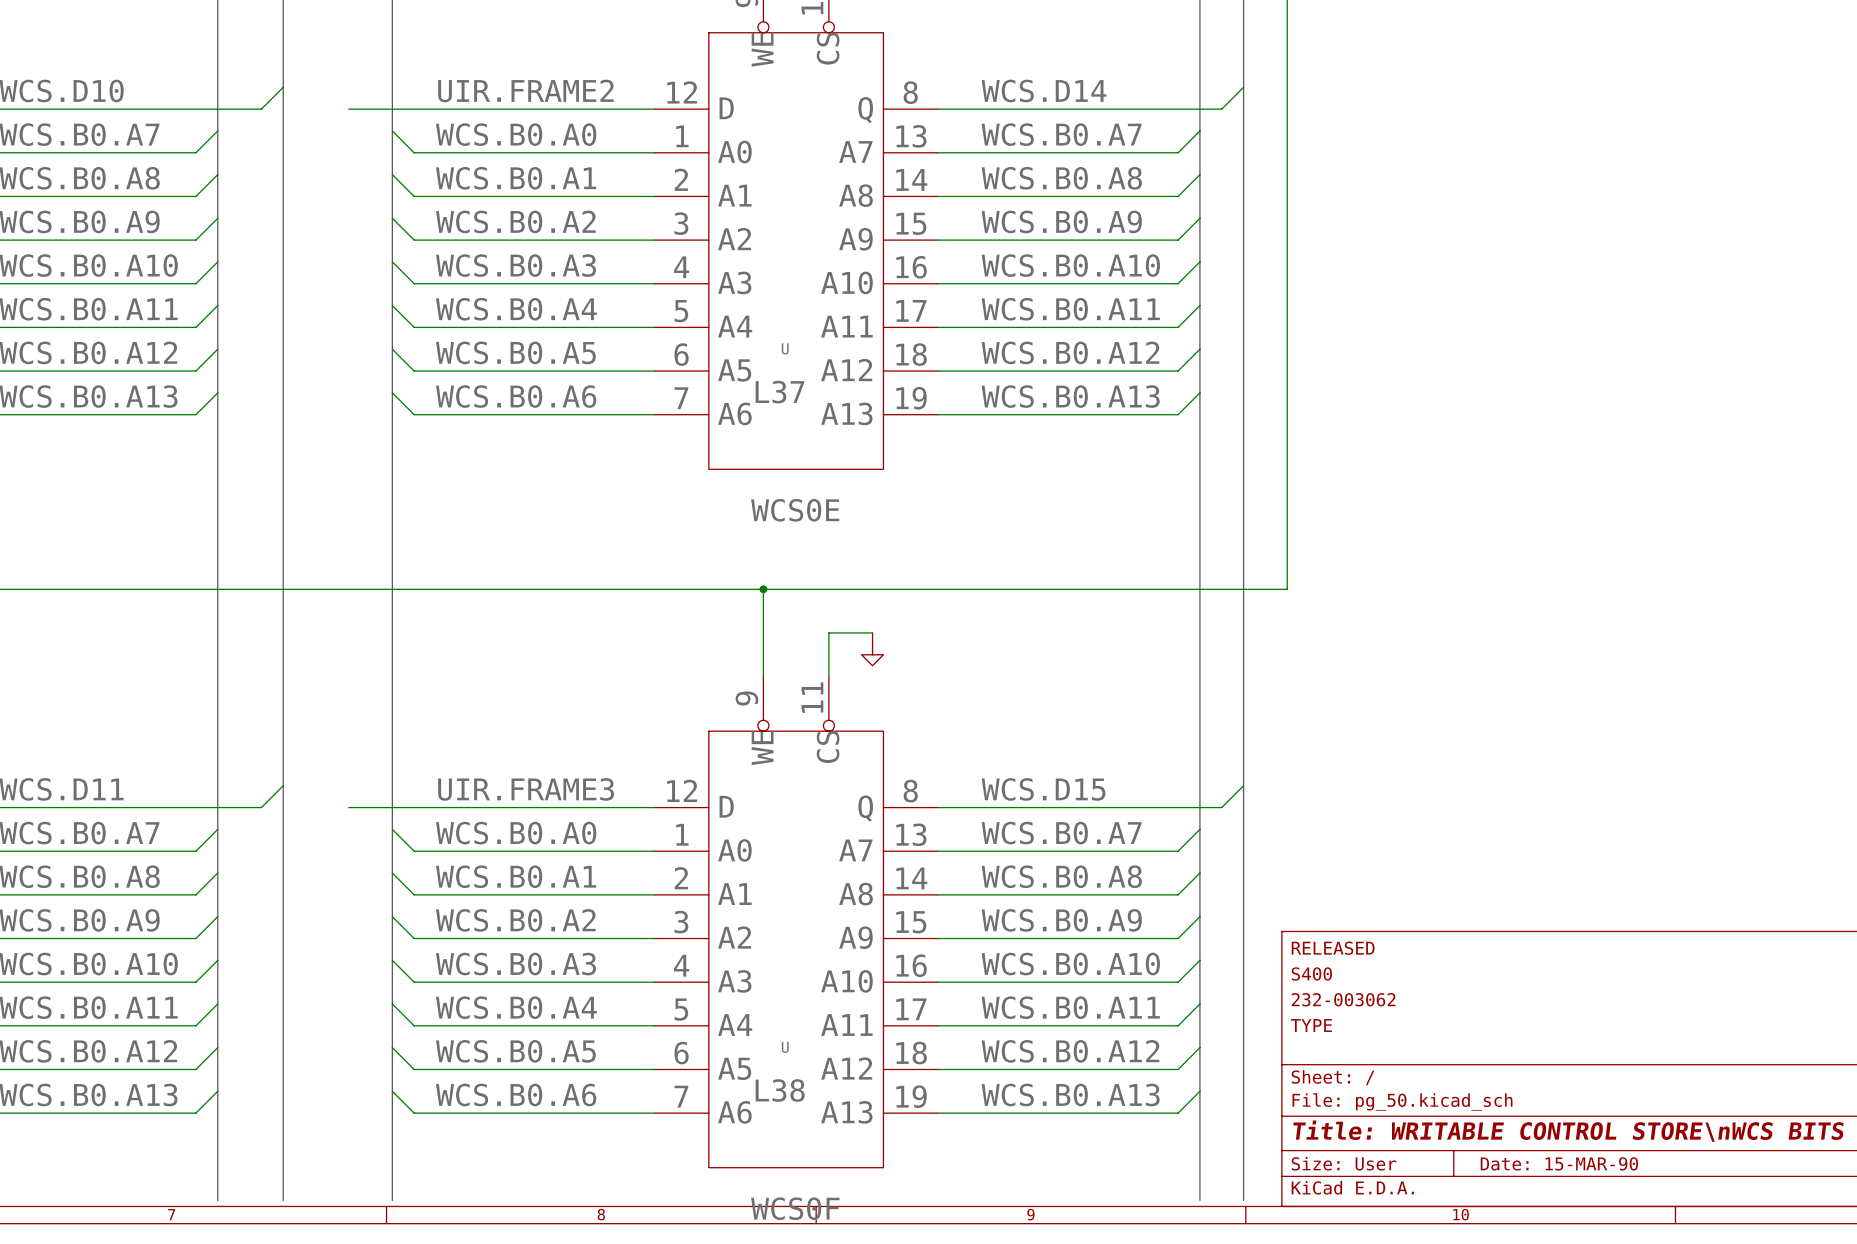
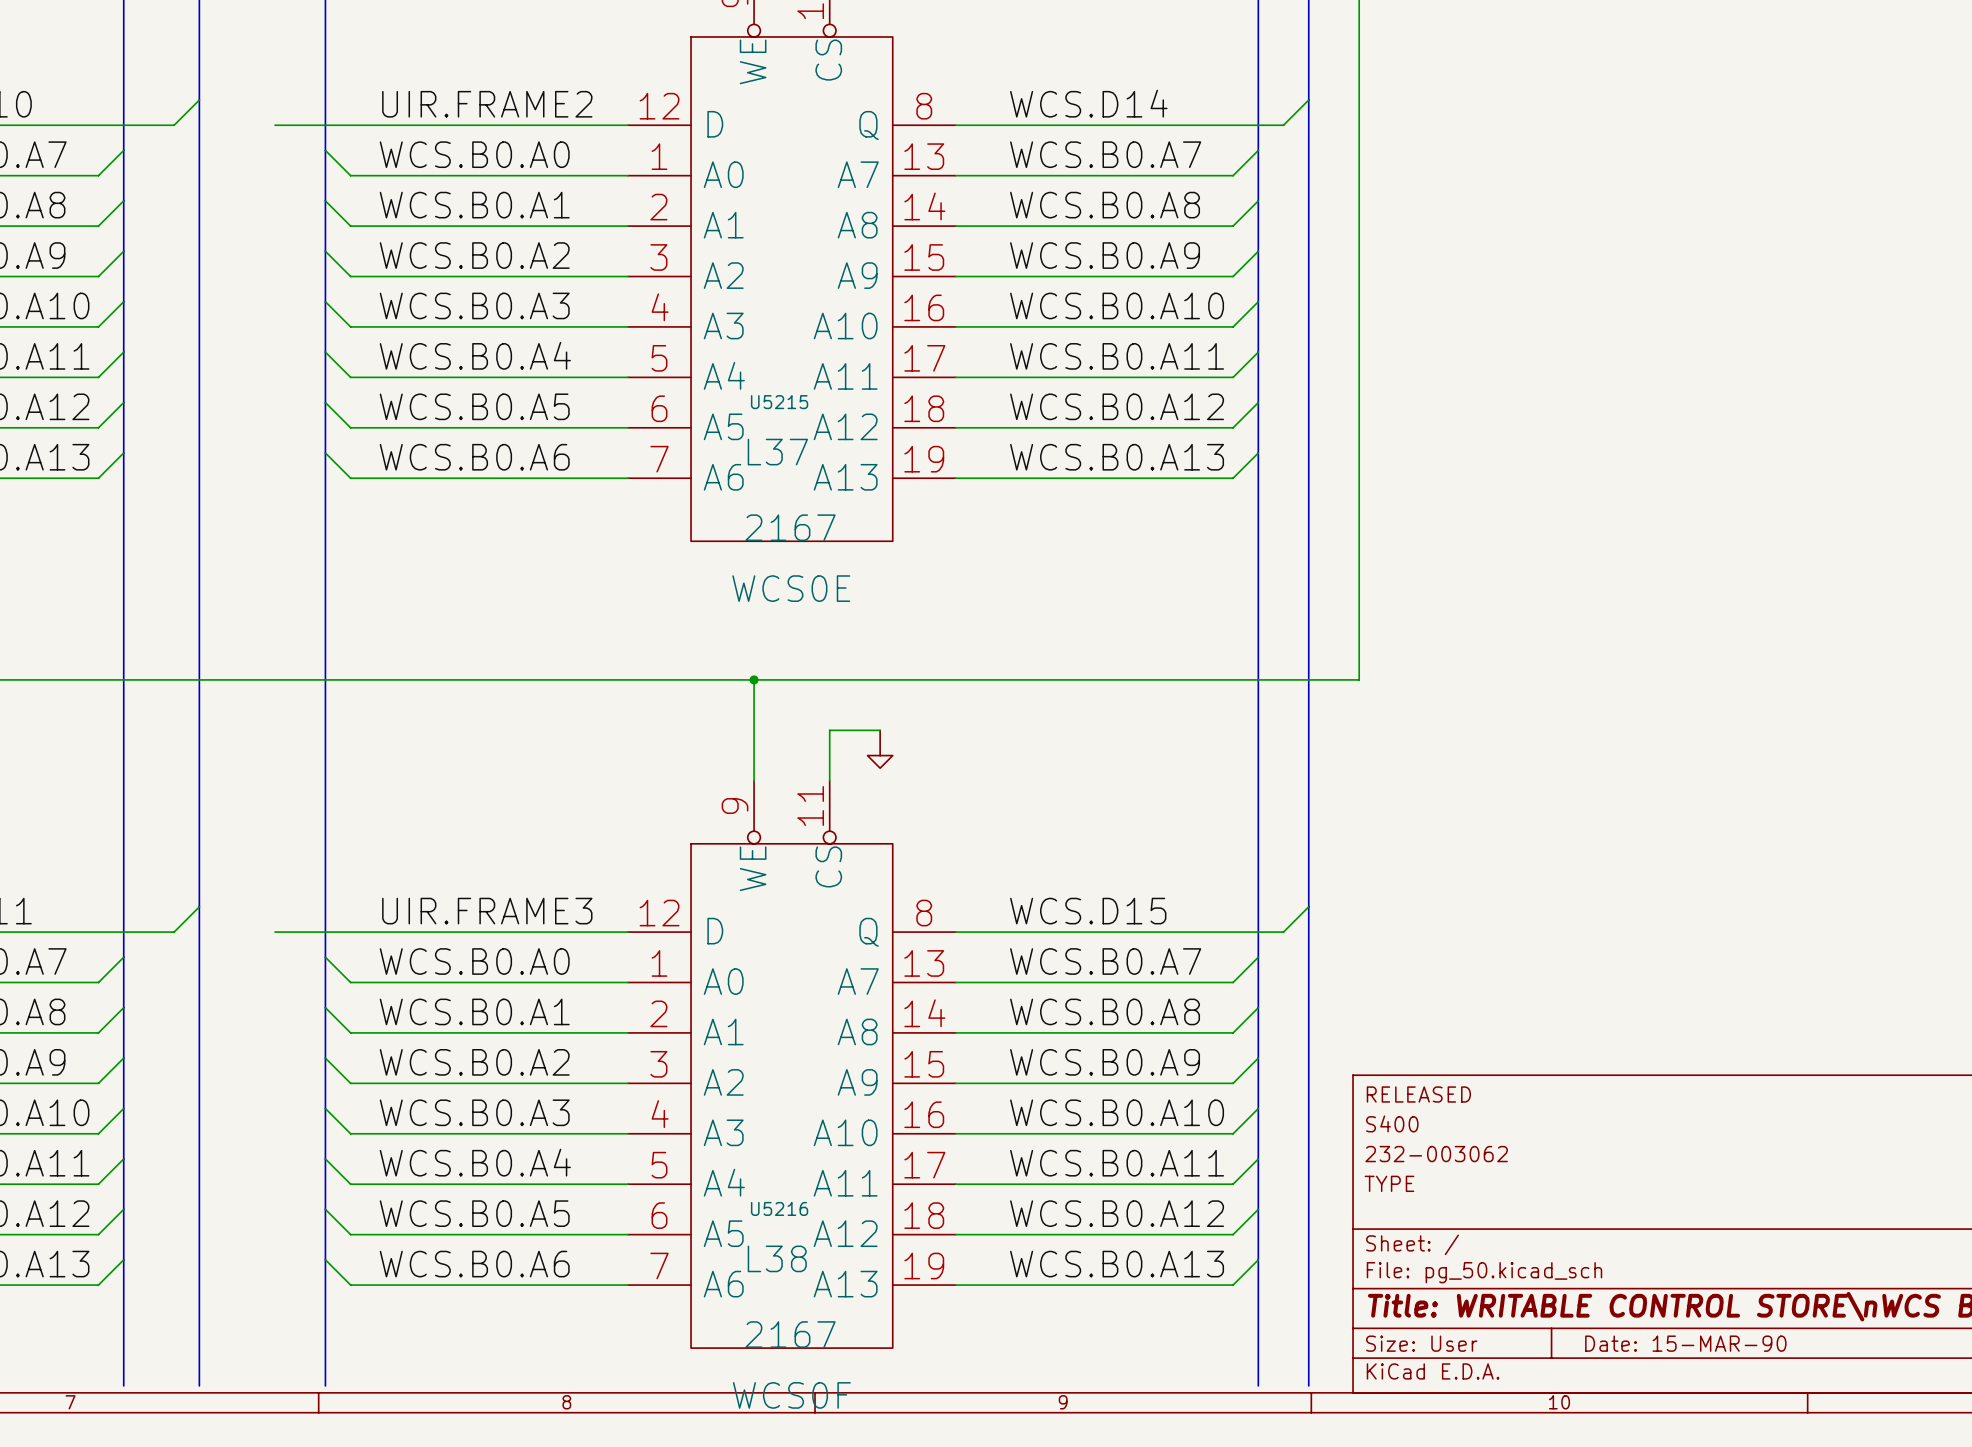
U name: U (785, 348) -> U5215 (779, 402)
U value: none -> 2167 (790, 527)
U name: U (785, 1047) -> U5216 (779, 1208)
U value: none -> 2167 (790, 1334)

